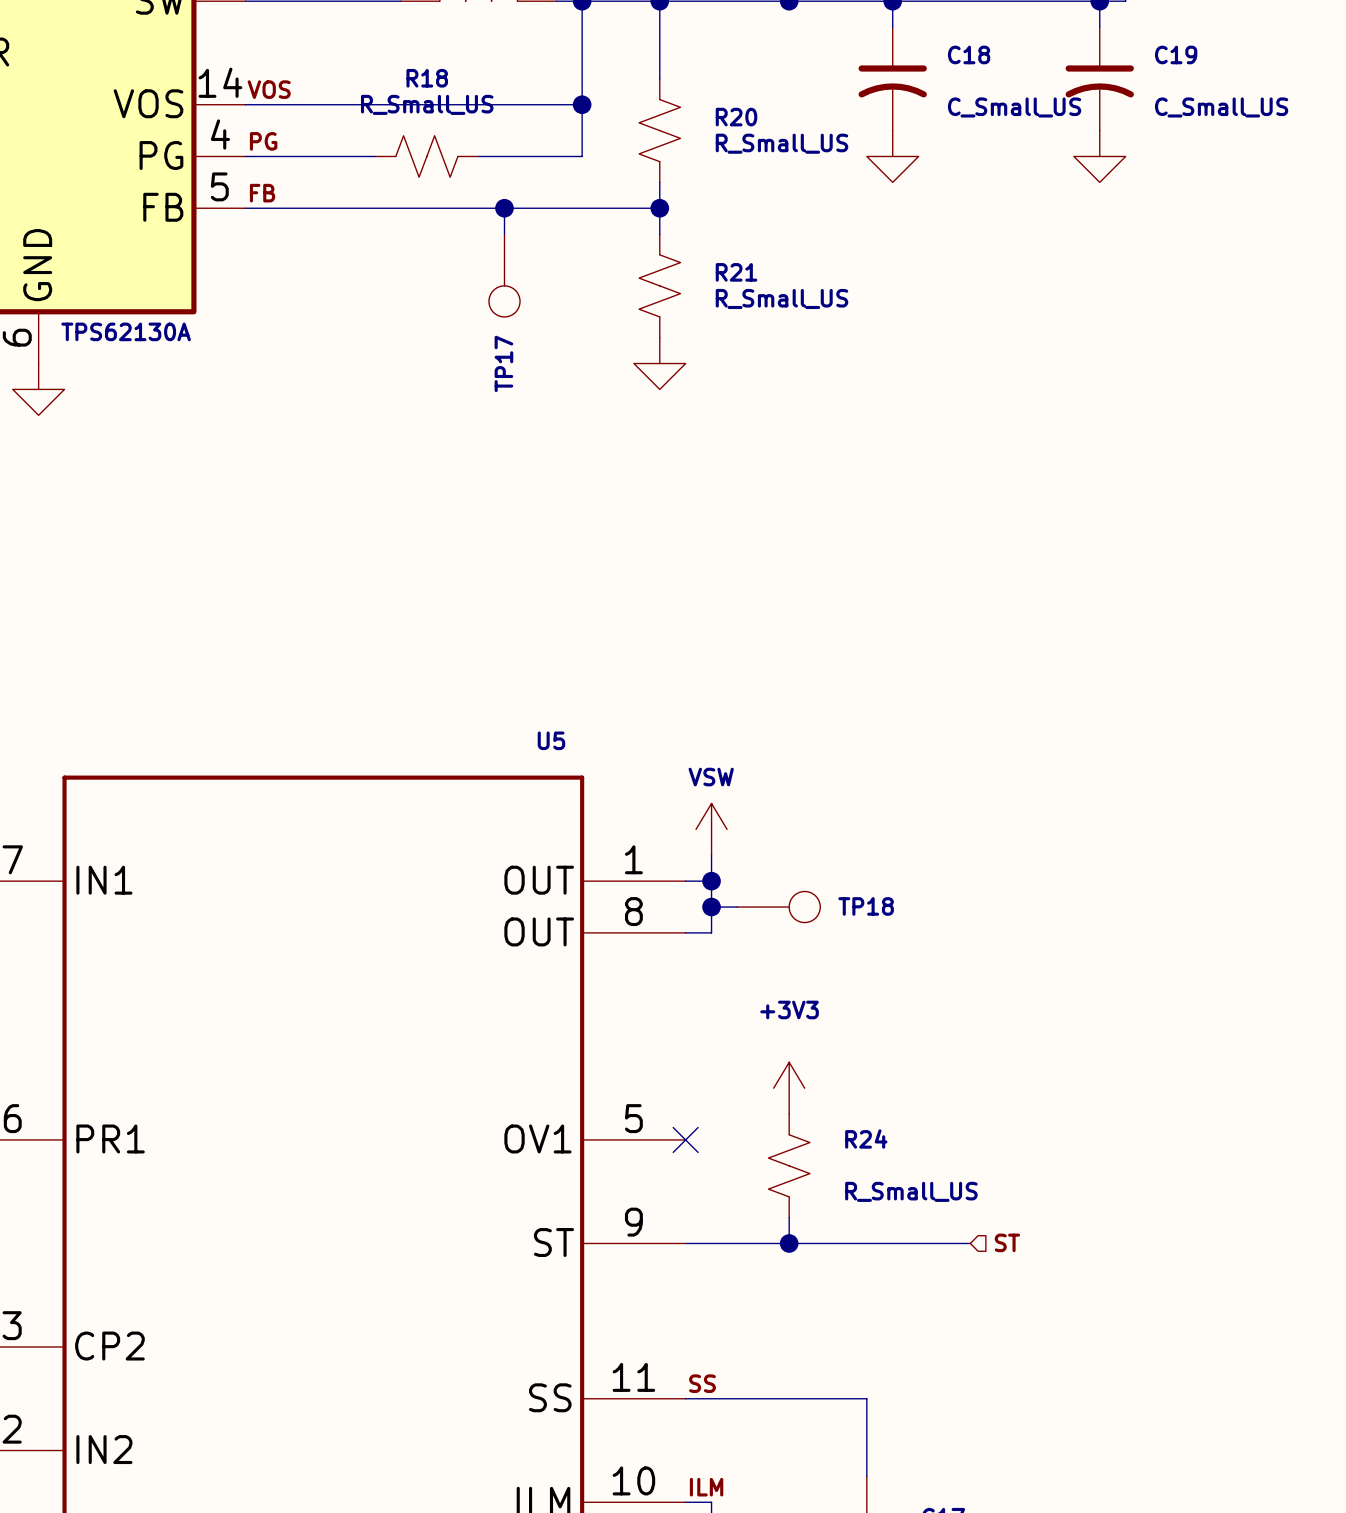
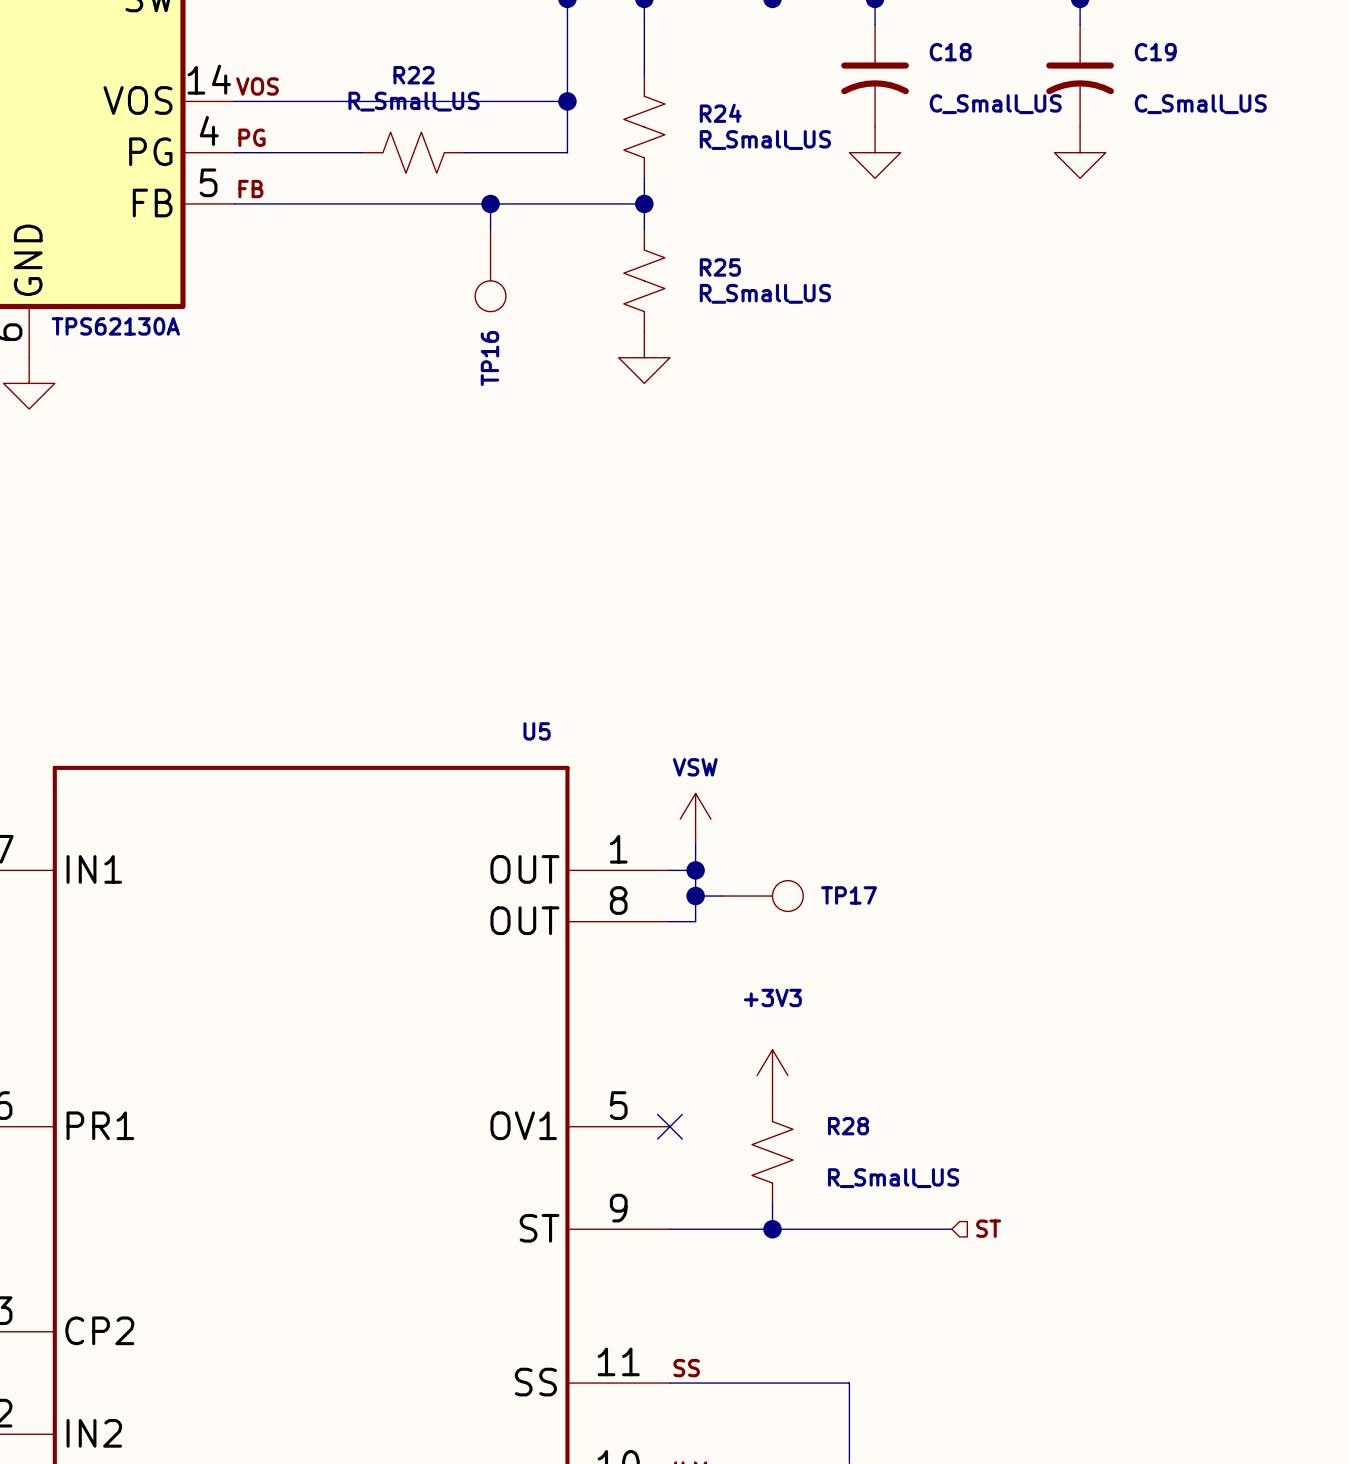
R18 name: R18 (427, 78) -> R22 (414, 75)
R20 name: R20 (736, 117) -> R24 (720, 113)
R21 name: R21 (736, 272) -> R25 (720, 267)
TP17 name: TP17 (503, 363) -> TP16 (489, 358)
TP18 name: TP18 (866, 906) -> TP17 (849, 895)
R24 name: R24 (866, 1139) -> R28 (848, 1126)

